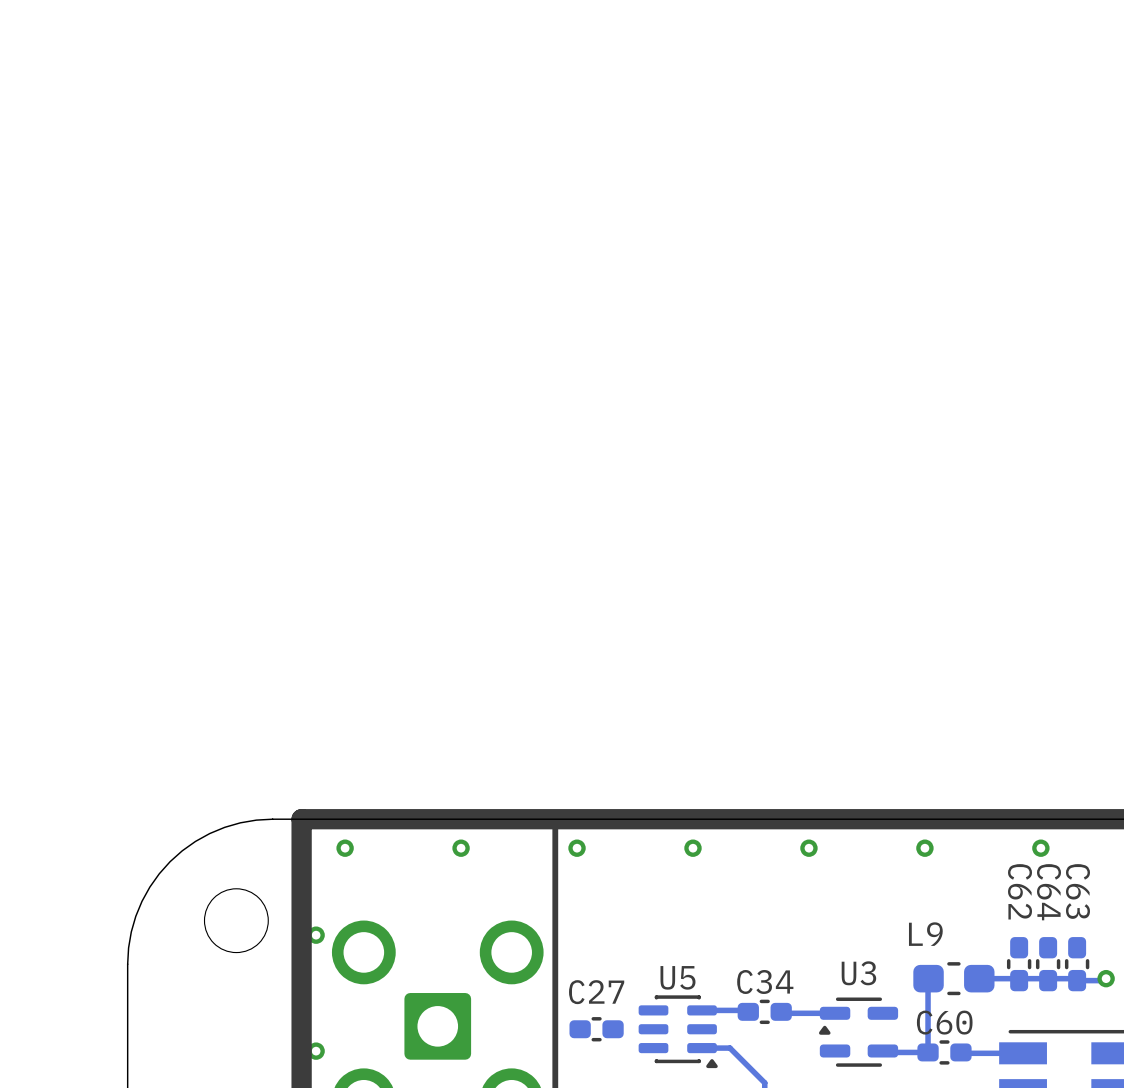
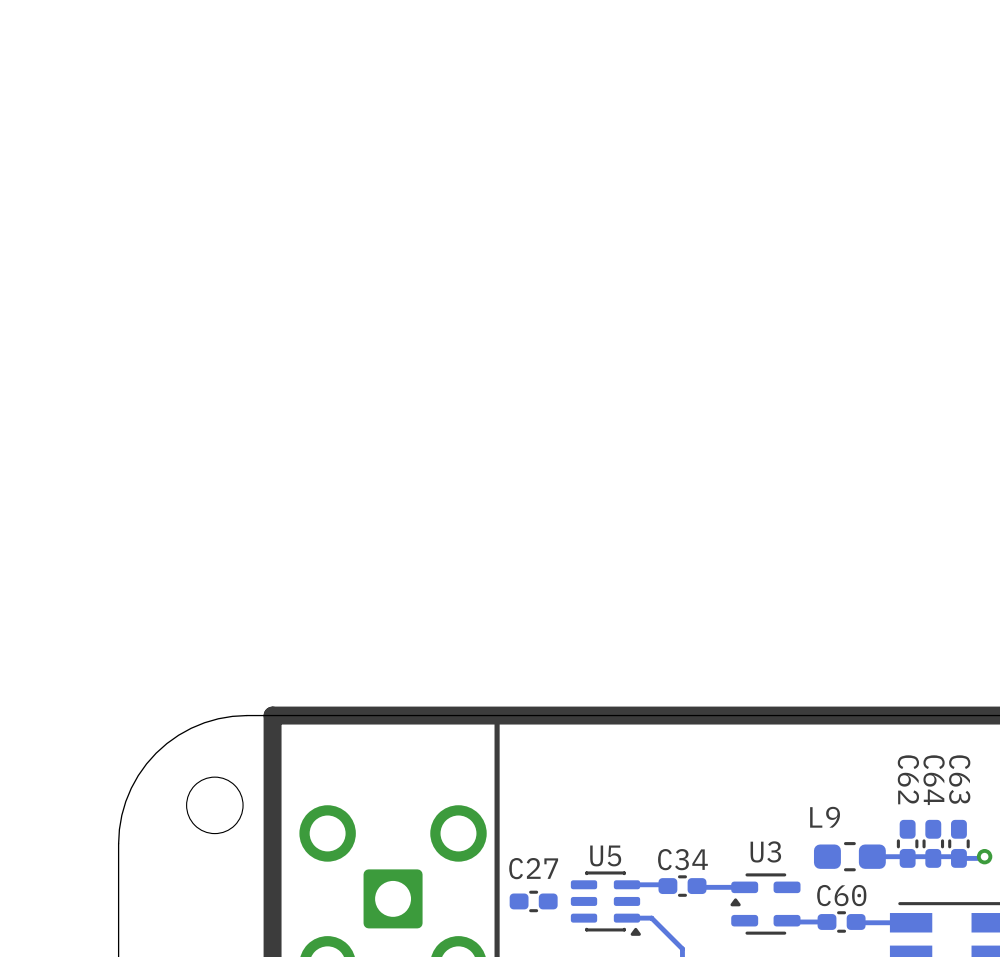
via: (345, 848) -> none
via: (461, 848) -> none
via: (577, 848) -> none
via: (692, 848) -> none
via: (808, 848) -> none
via: (924, 848) -> none
via: (1040, 848) -> none
via: (316, 935) -> none
track: (928, 978) (928, 1052) -> none
via: (316, 1051) -> none

